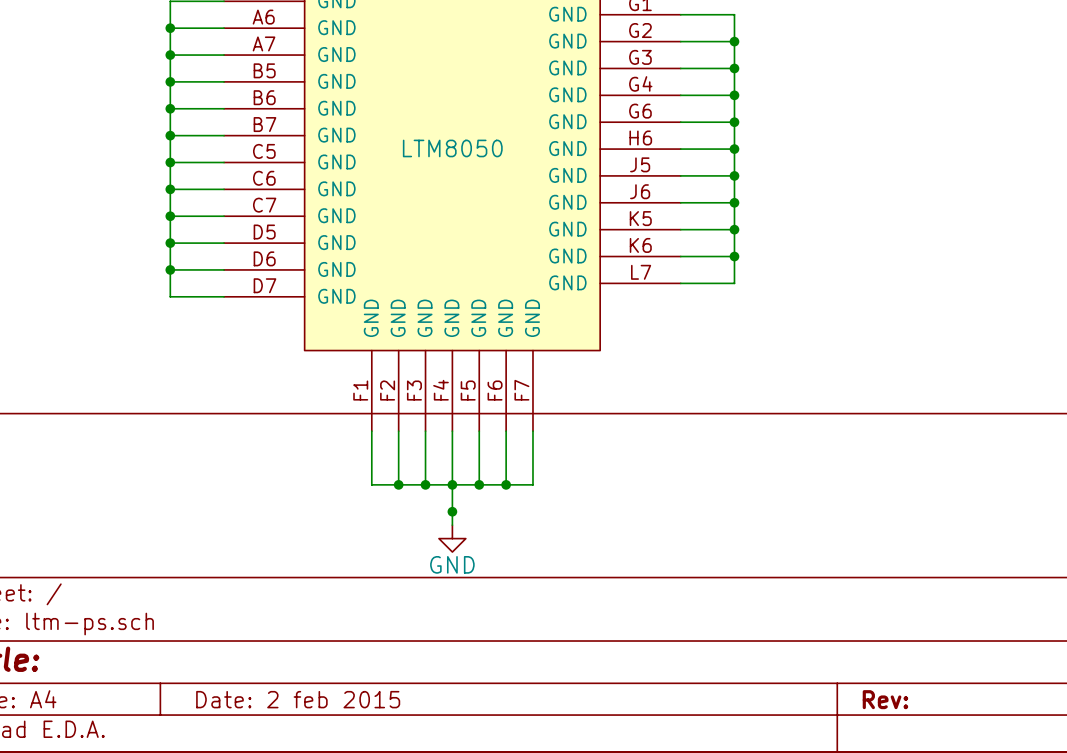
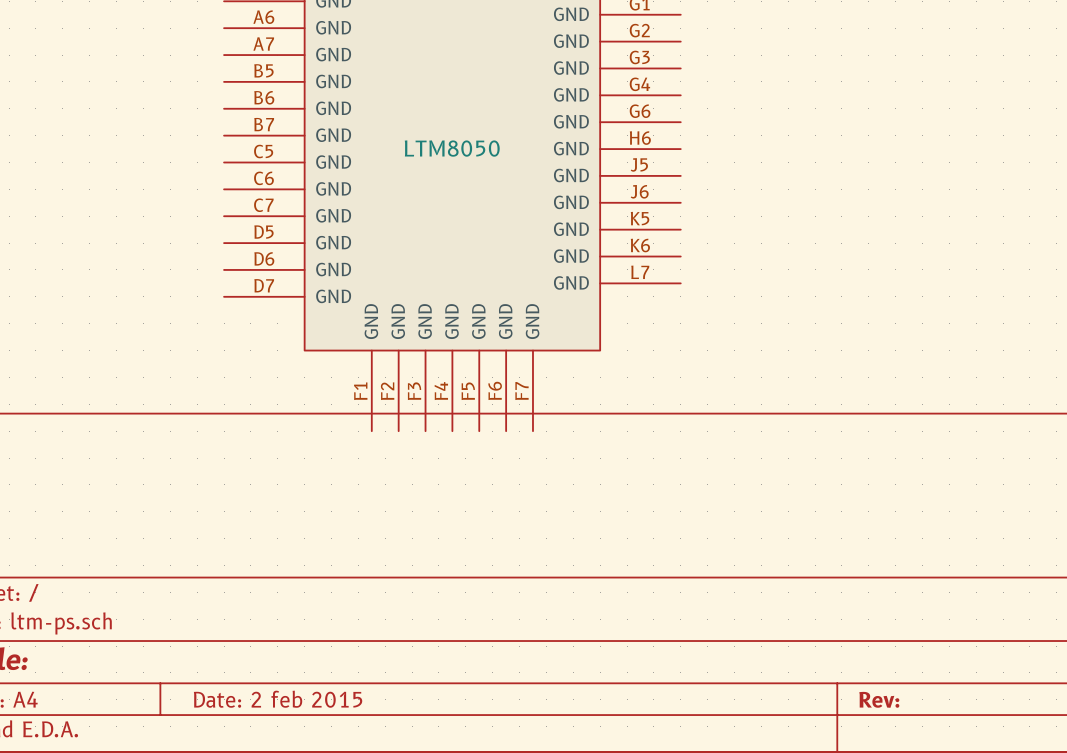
wire: (224, 1) (170, 1) (170, 296) (224, 296) -> none
wire: (680, 14) (734, 14) (734, 283) (680, 283) -> none
wire: (170, 28) (224, 28) -> none
junction: (170, 28) -> none
wire: (680, 41) (734, 41) -> none
junction: (734, 41) -> none
wire: (170, 55) (224, 55) -> none
junction: (170, 55) -> none
wire: (680, 68) (734, 68) -> none
junction: (734, 68) -> none
wire: (170, 81) (224, 81) -> none
junction: (170, 81) -> none
wire: (680, 95) (734, 95) -> none
junction: (734, 95) -> none
wire: (170, 108) (224, 108) -> none
junction: (170, 108) -> none
wire: (680, 122) (734, 122) -> none
junction: (734, 122) -> none
wire: (170, 135) (224, 135) -> none
junction: (170, 135) -> none
wire: (680, 149) (734, 149) -> none
junction: (734, 149) -> none
wire: (170, 162) (224, 162) -> none
junction: (170, 162) -> none
wire: (680, 175) (734, 175) -> none
junction: (734, 175) -> none
wire: (170, 189) (224, 189) -> none
junction: (170, 189) -> none
wire: (680, 202) (734, 202) -> none
junction: (734, 202) -> none
wire: (170, 216) (224, 216) -> none
junction: (170, 216) -> none
wire: (680, 229) (734, 229) -> none
junction: (734, 229) -> none
wire: (170, 243) (224, 243) -> none
junction: (170, 243) -> none
wire: (680, 256) (734, 256) -> none
junction: (734, 256) -> none
wire: (170, 269) (224, 269) -> none
junction: (170, 269) -> none
wire: (371, 431) (371, 484) (532, 484) (532, 431) -> none
wire: (398, 431) (398, 484) -> none
wire: (425, 431) (425, 484) -> none
wire: (452, 431) (452, 525) -> none
wire: (479, 431) (479, 484) -> none
wire: (506, 431) (506, 484) -> none
junction: (398, 484) -> none
junction: (425, 484) -> none
junction: (452, 484) -> none
junction: (479, 484) -> none
junction: (506, 484) -> none
junction: (452, 511) -> none
power symbol: GND (452, 538) -> none

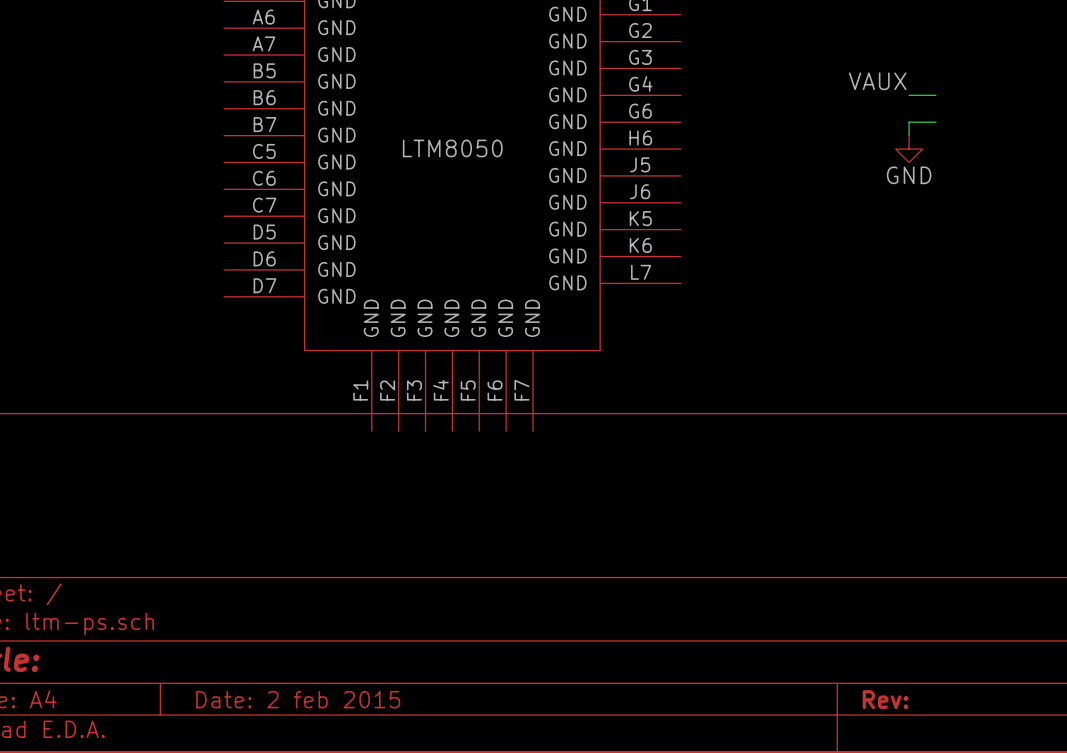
label: none -> VAUX (877, 81)
wire: none -> (909, 95) (935, 95)
wire: none -> (935, 122) (909, 122) (909, 135)
power symbol: none -> GND (909, 149)

